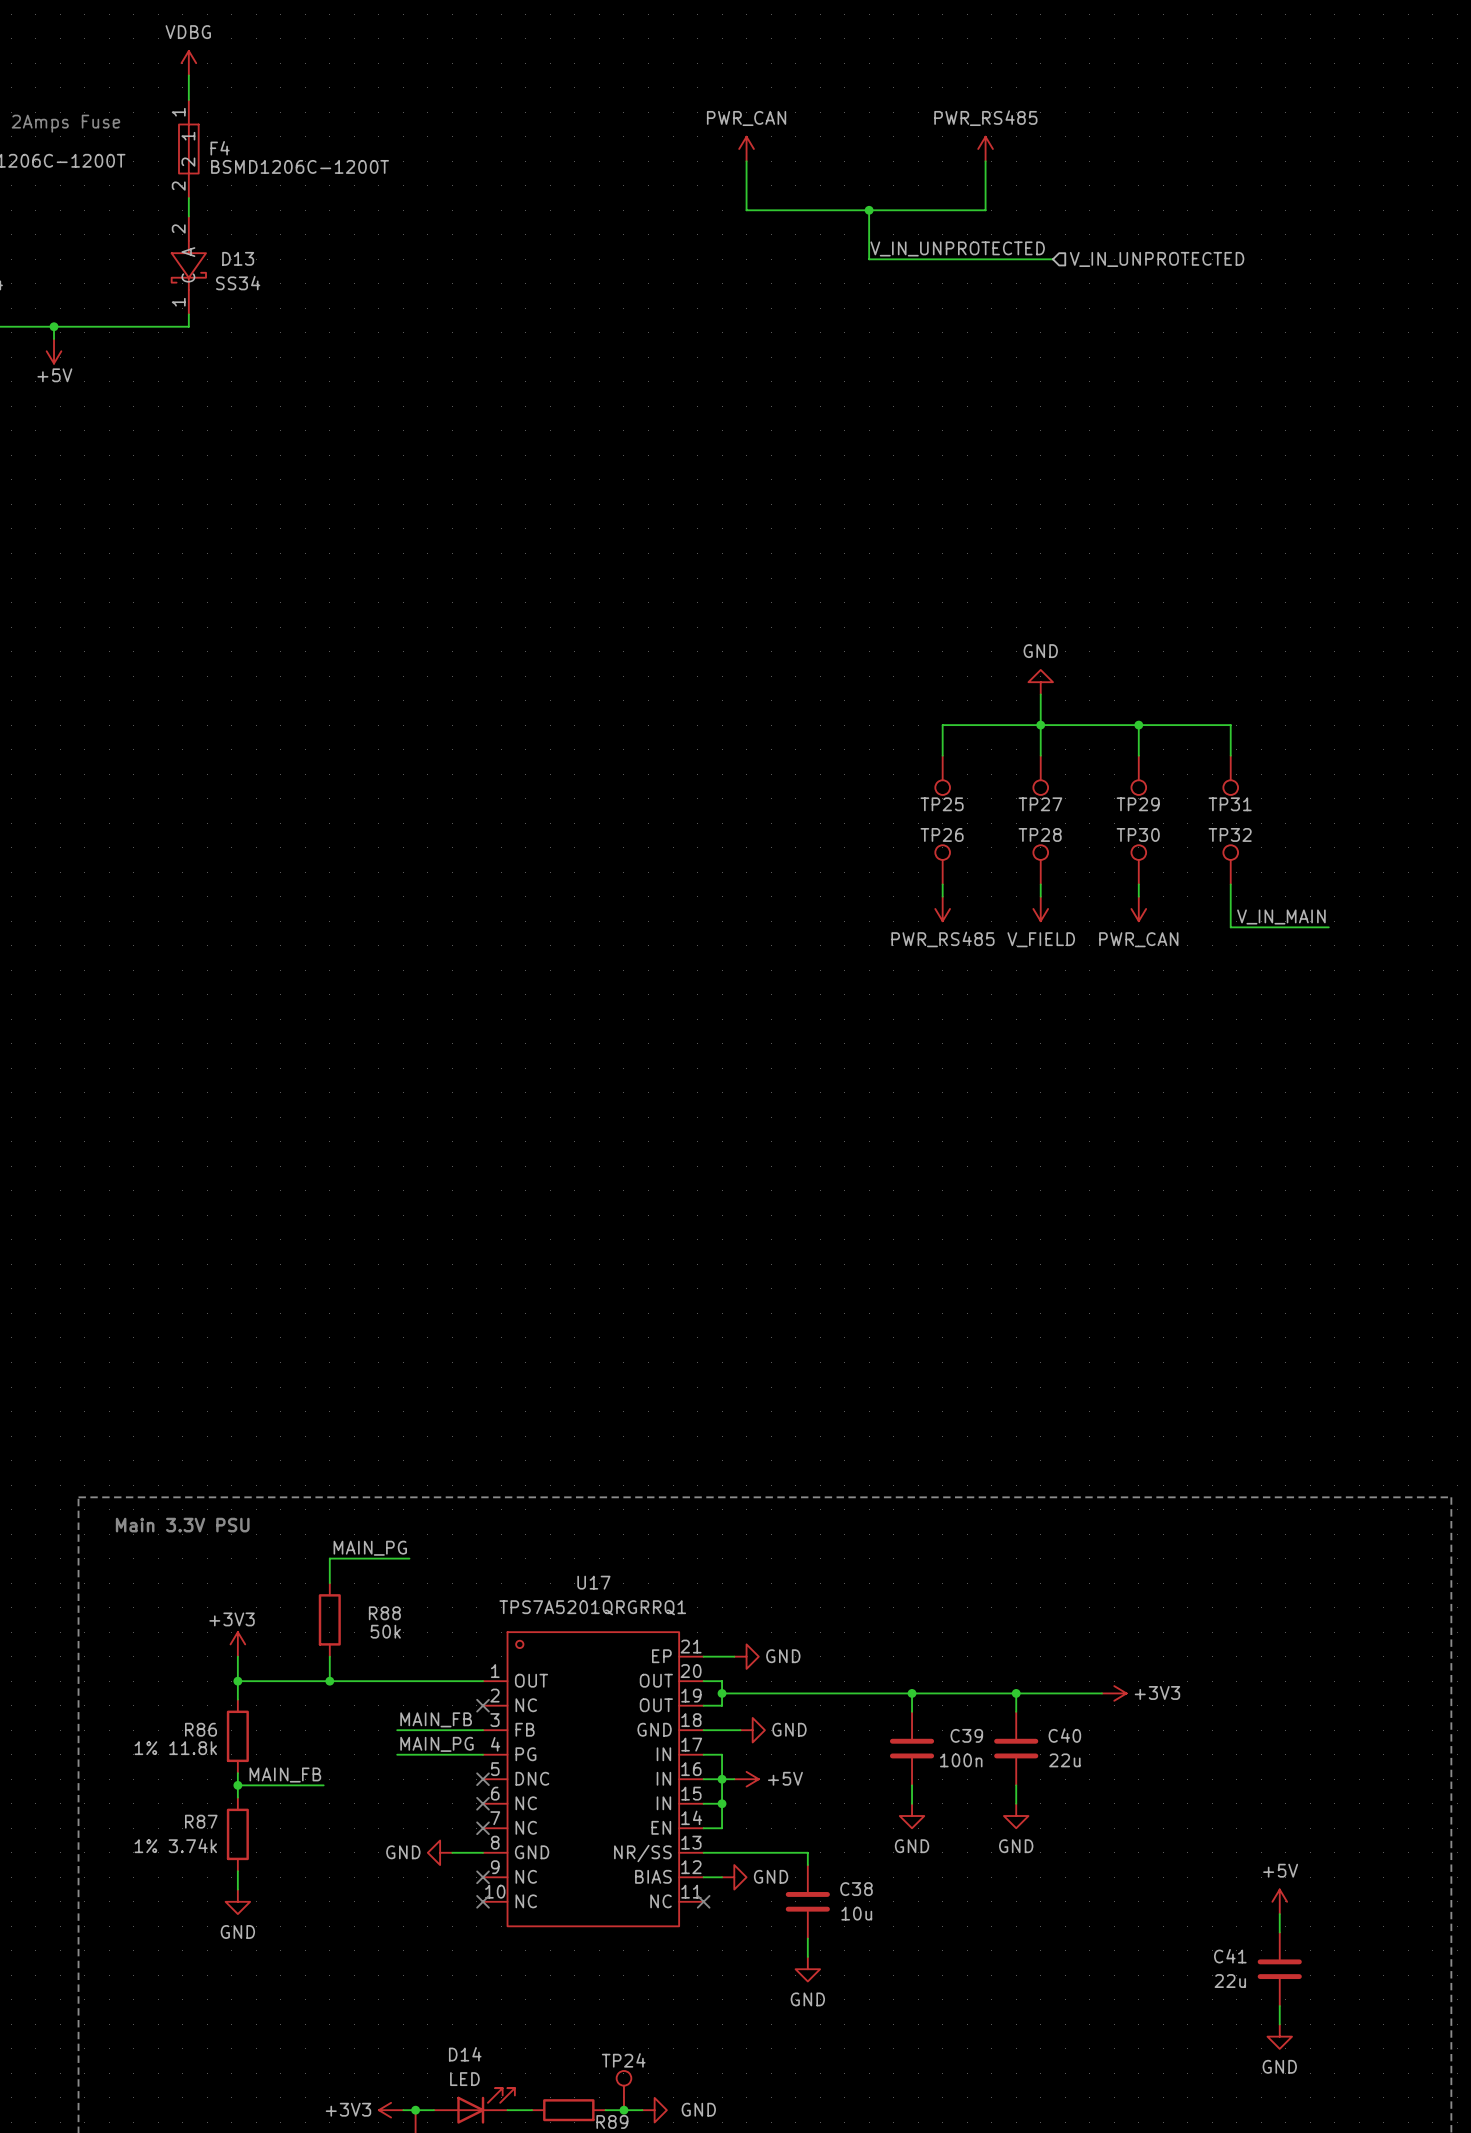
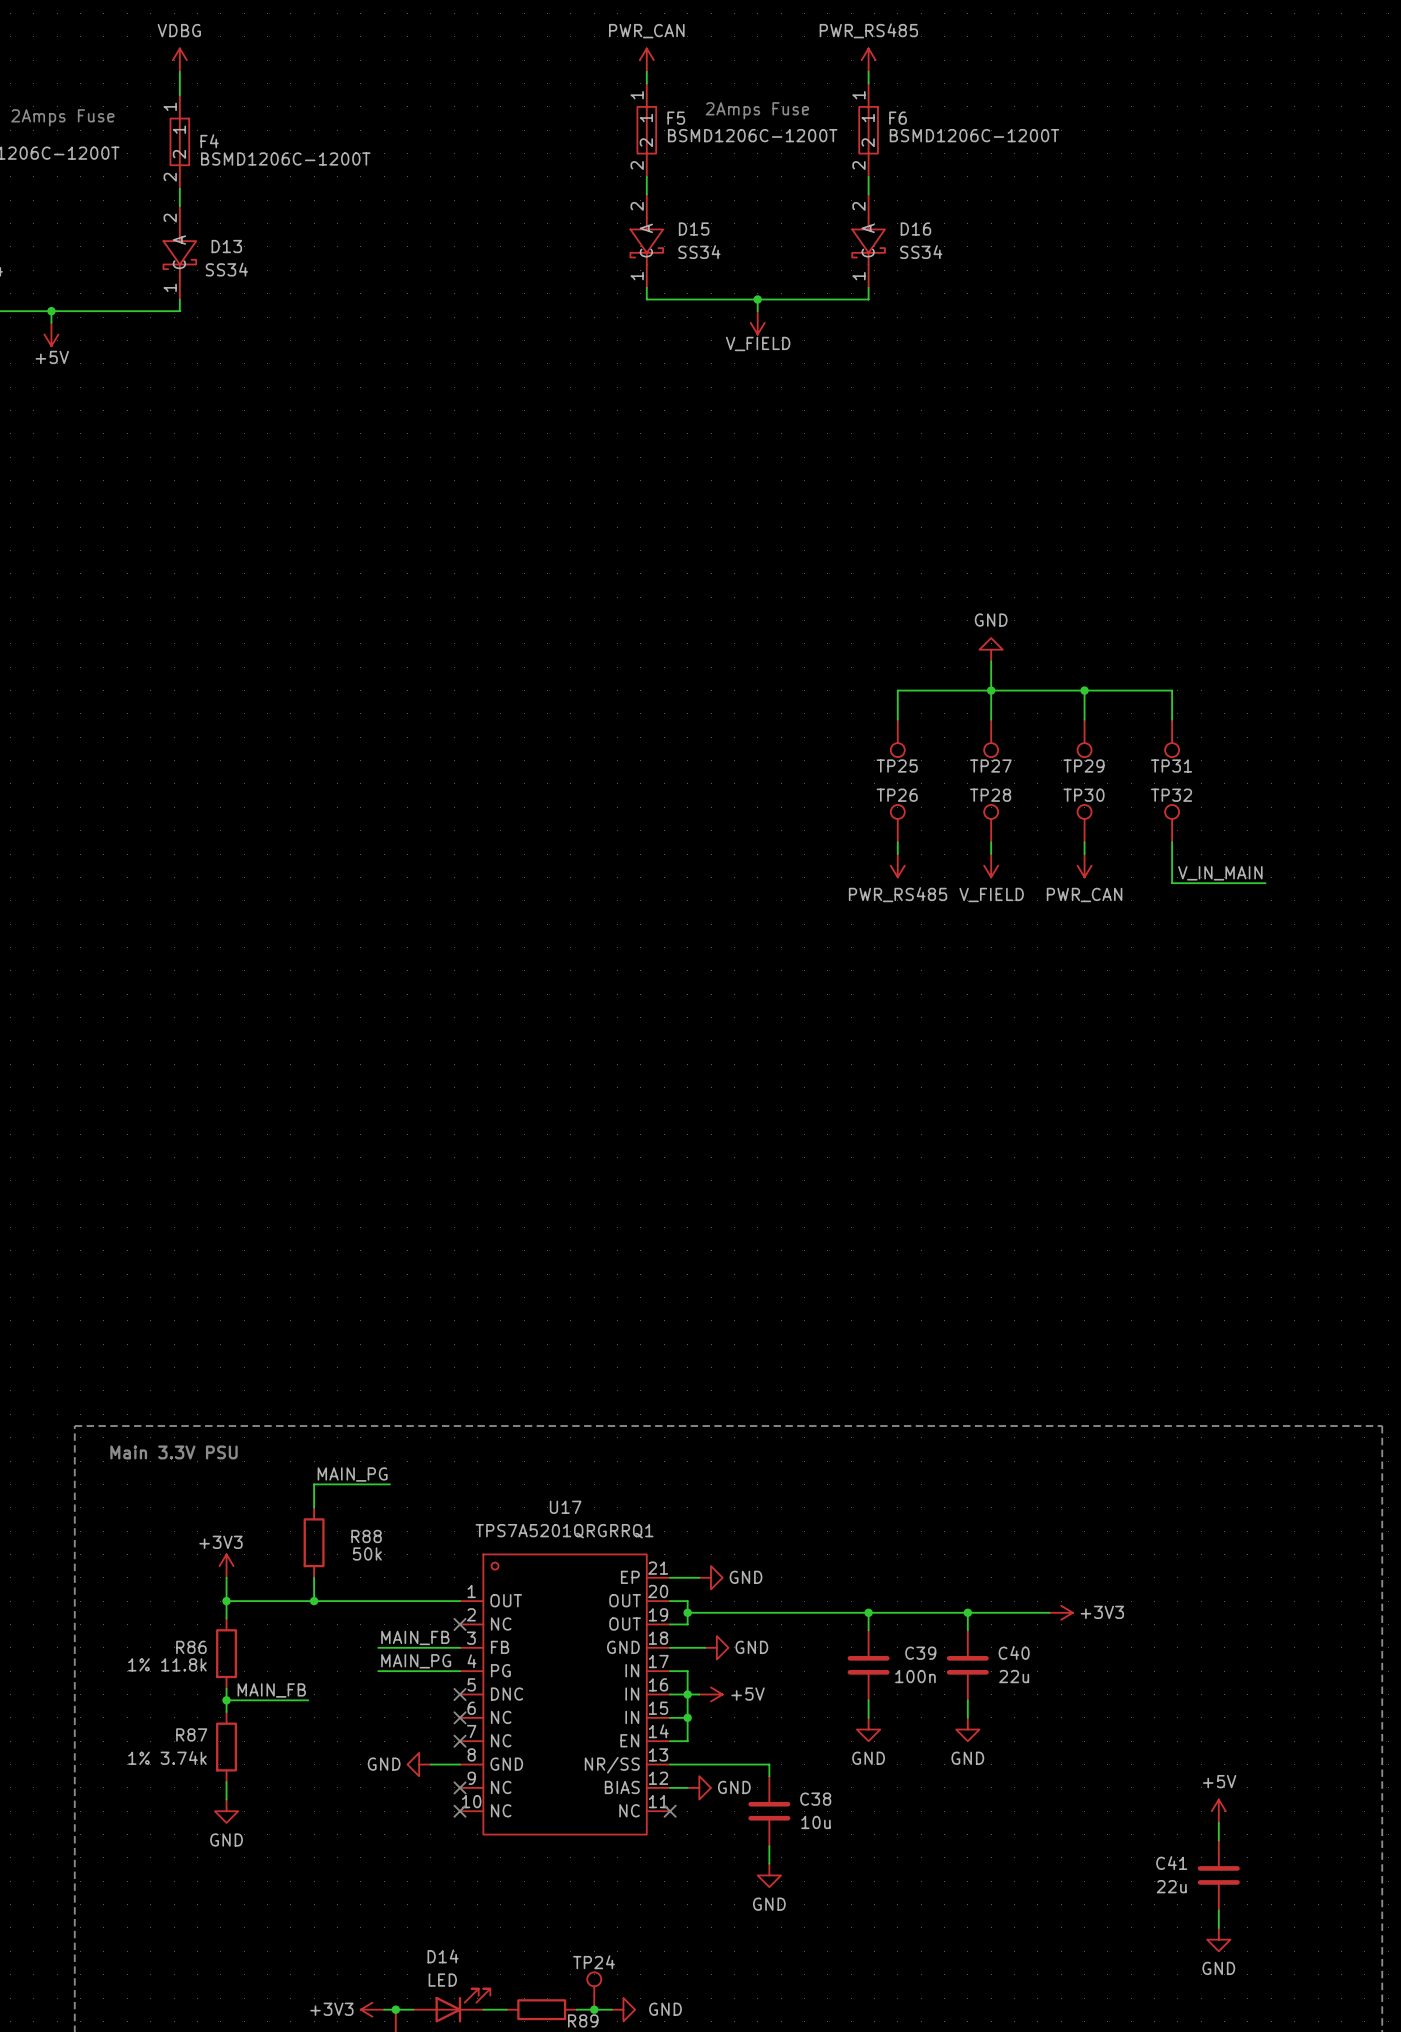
wire: none -> (646, 71) (646, 83)
wire: none -> (868, 71) (868, 83)
text: none -> 2Amps Fuse (757, 110)
F5: none -> BSMD1206C-1200T (646, 130)
F6: none -> BSMD1206C-1200T (868, 130)
power symbol position: PWR_CAN (746, 149) -> PWR_CAN (646, 60)
power symbol position: PWR_RS485 (985, 149) -> PWR_RS485 (868, 60)
wire: (746, 161) (746, 210) (985, 210) (985, 161) -> none
wire: none -> (646, 176) (646, 194)
wire: none -> (868, 176) (868, 194)
wire: (869, 210) (869, 259) (1052, 259) -> none
junction: (869, 210) -> none
label: V_IN_UNPROTECTED (957, 248) -> none
D15: none -> SS34 (646, 241)
D16: none -> SS34 (868, 241)
hierarchical label: V_IN_UNPROTECTED (1157, 259) -> none
wire: none -> (646, 287) (646, 299) (868, 299) (868, 287)
wire: none -> (757, 299) (757, 311)
junction: none -> (757, 299)
power symbol: none -> V_FIELD (757, 322)

